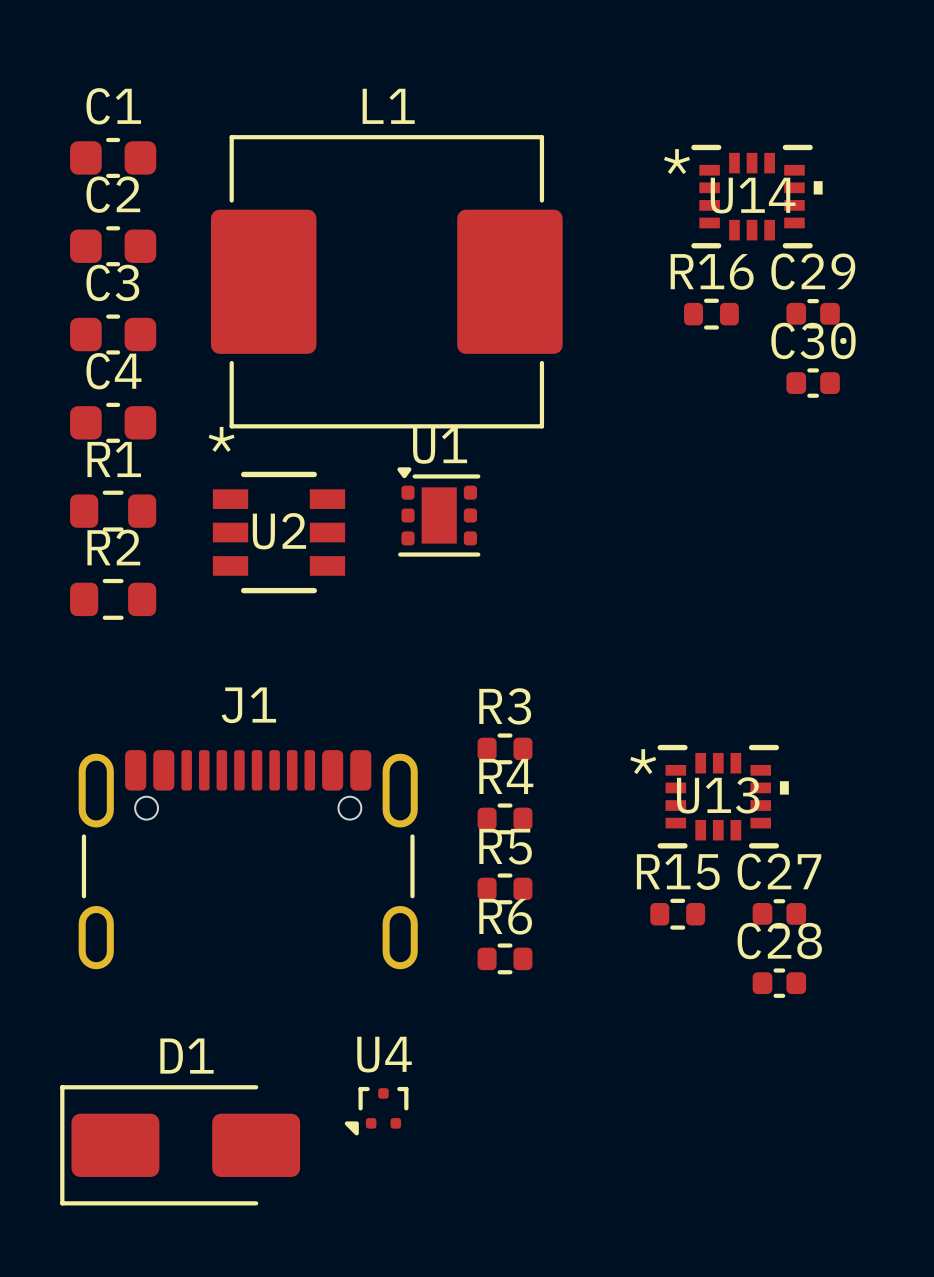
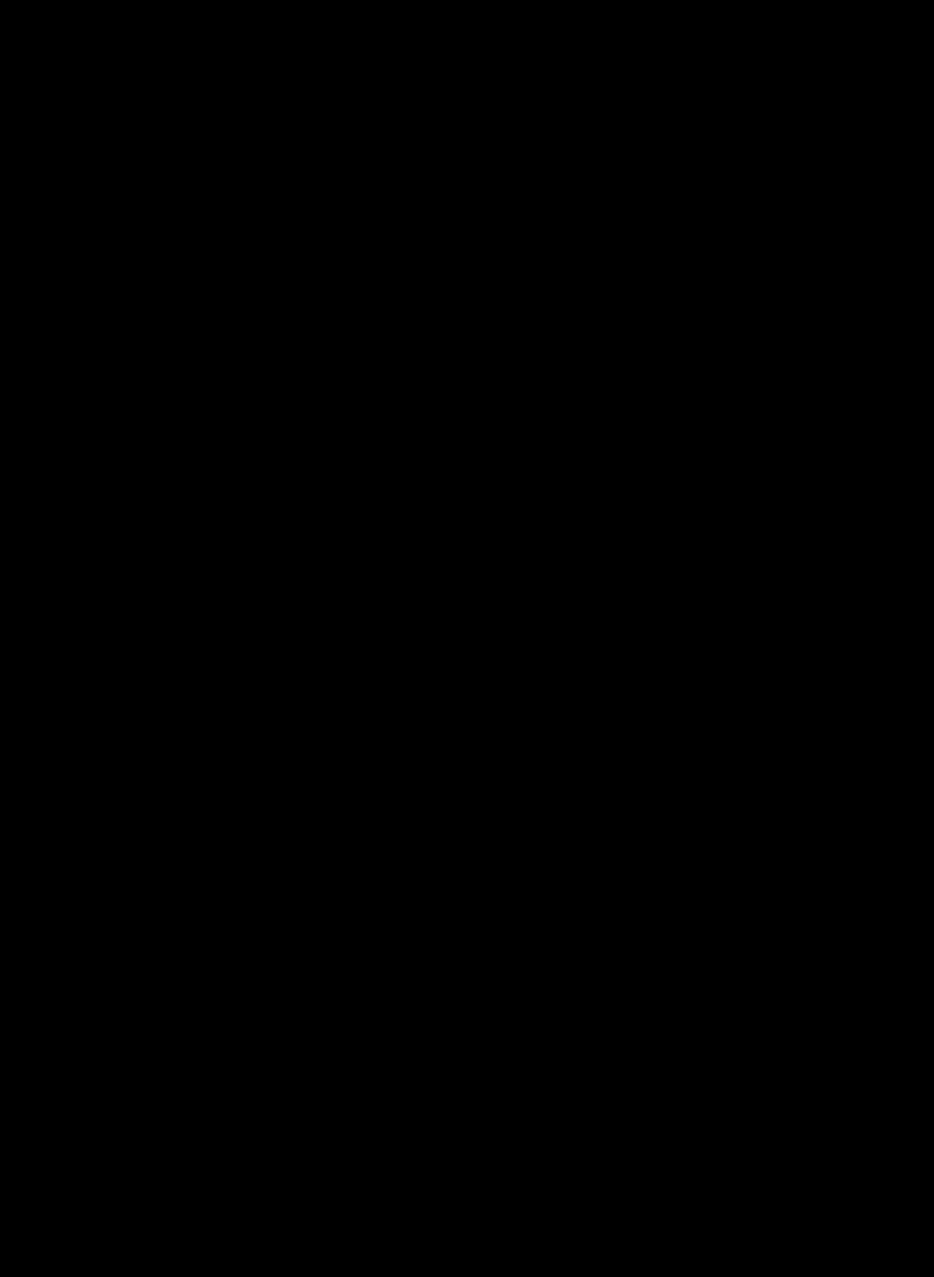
C1: (113, 157) -> none
U14: (756, 196) -> none
C2: (113, 246) -> none
L1: (386, 281) -> none
C29: (813, 313) -> none
R16: (711, 314) -> none
C3: (113, 334) -> none
C30: (813, 383) -> none
C4: (113, 422) -> none
R1: (113, 511) -> none
U1: (438, 511) -> none
U2: (278, 532) -> none
R2: (113, 599) -> none
R3: (505, 748) -> none
U13: (723, 796) -> none
R4: (505, 818) -> none
J1: (248, 859) -> none
R5: (505, 888) -> none
C27: (779, 913) -> none
R15: (677, 914) -> none
R6: (505, 958) -> none
C28: (779, 983) -> none
U4: (376, 1111) -> none
D1: (180, 1145) -> none

